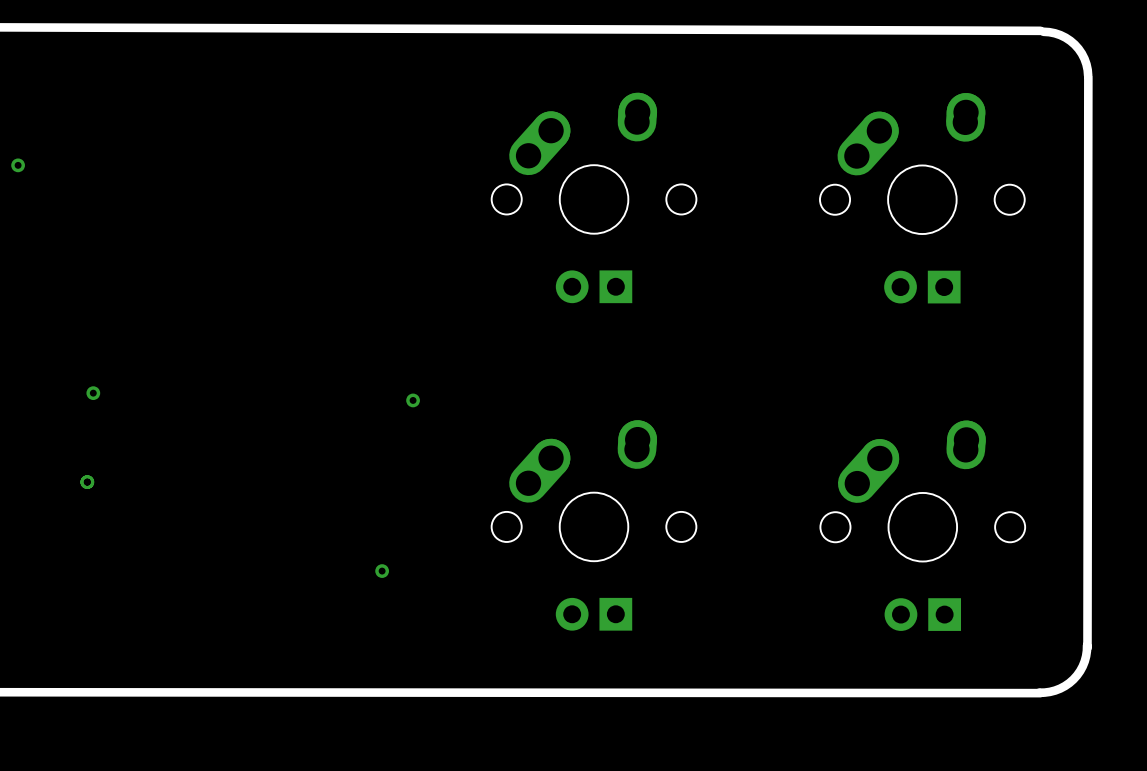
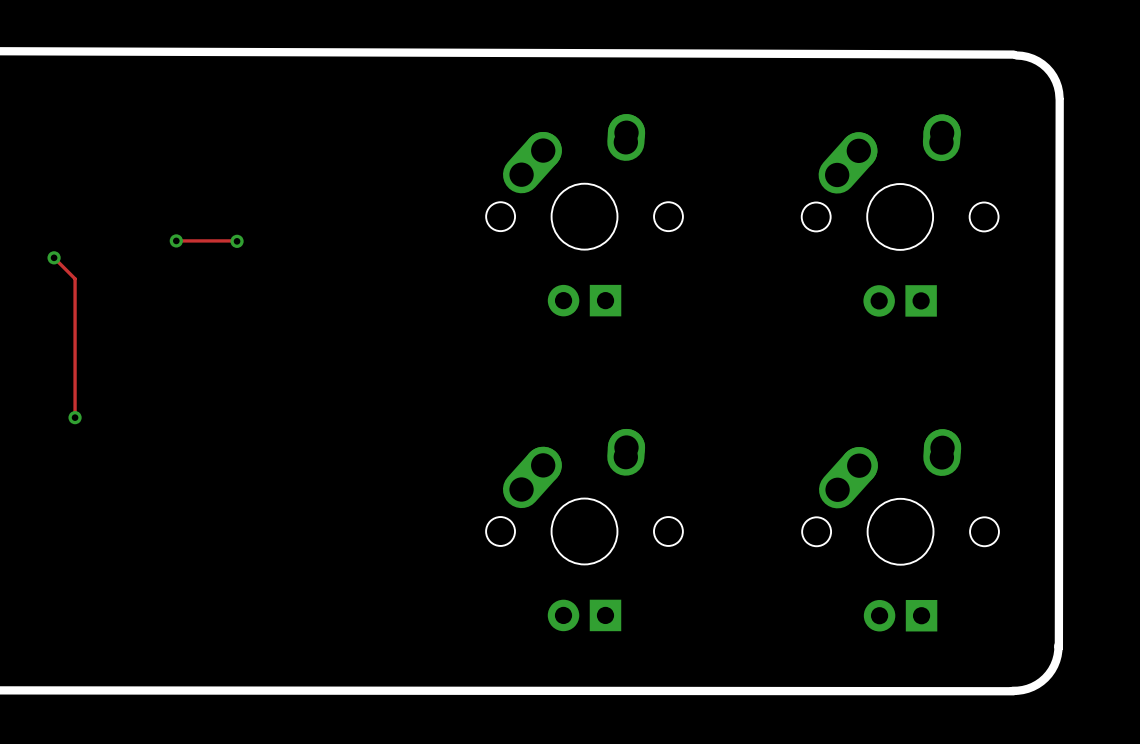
via: (18, 165) -> none
track: none -> (176, 240) (237, 241)
via: none -> (176, 240)
via: none -> (237, 241)
track: none -> (54, 257) (75, 278) (75, 417)
via: none -> (54, 257)
via position: (93, 393) -> (75, 417)
via: (413, 400) -> none
via: (87, 482) -> none
via: (382, 571) -> none

